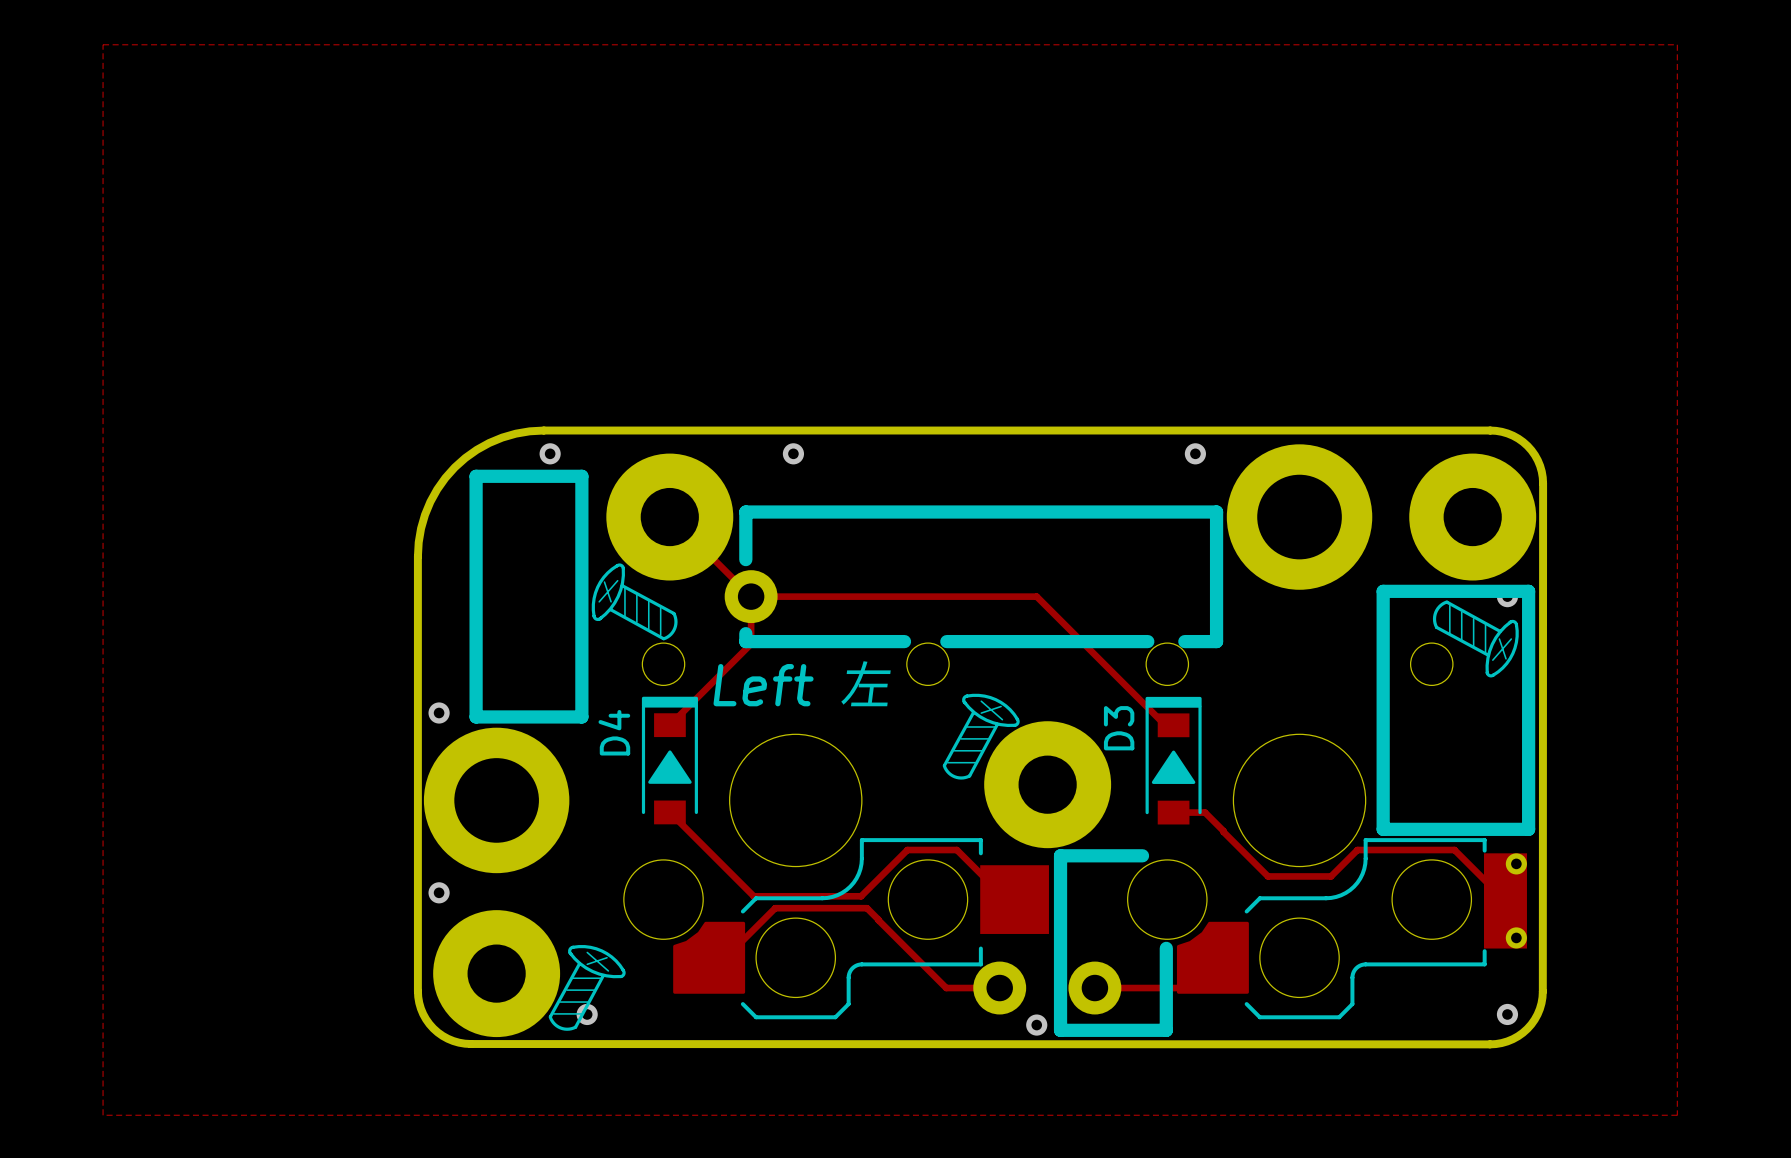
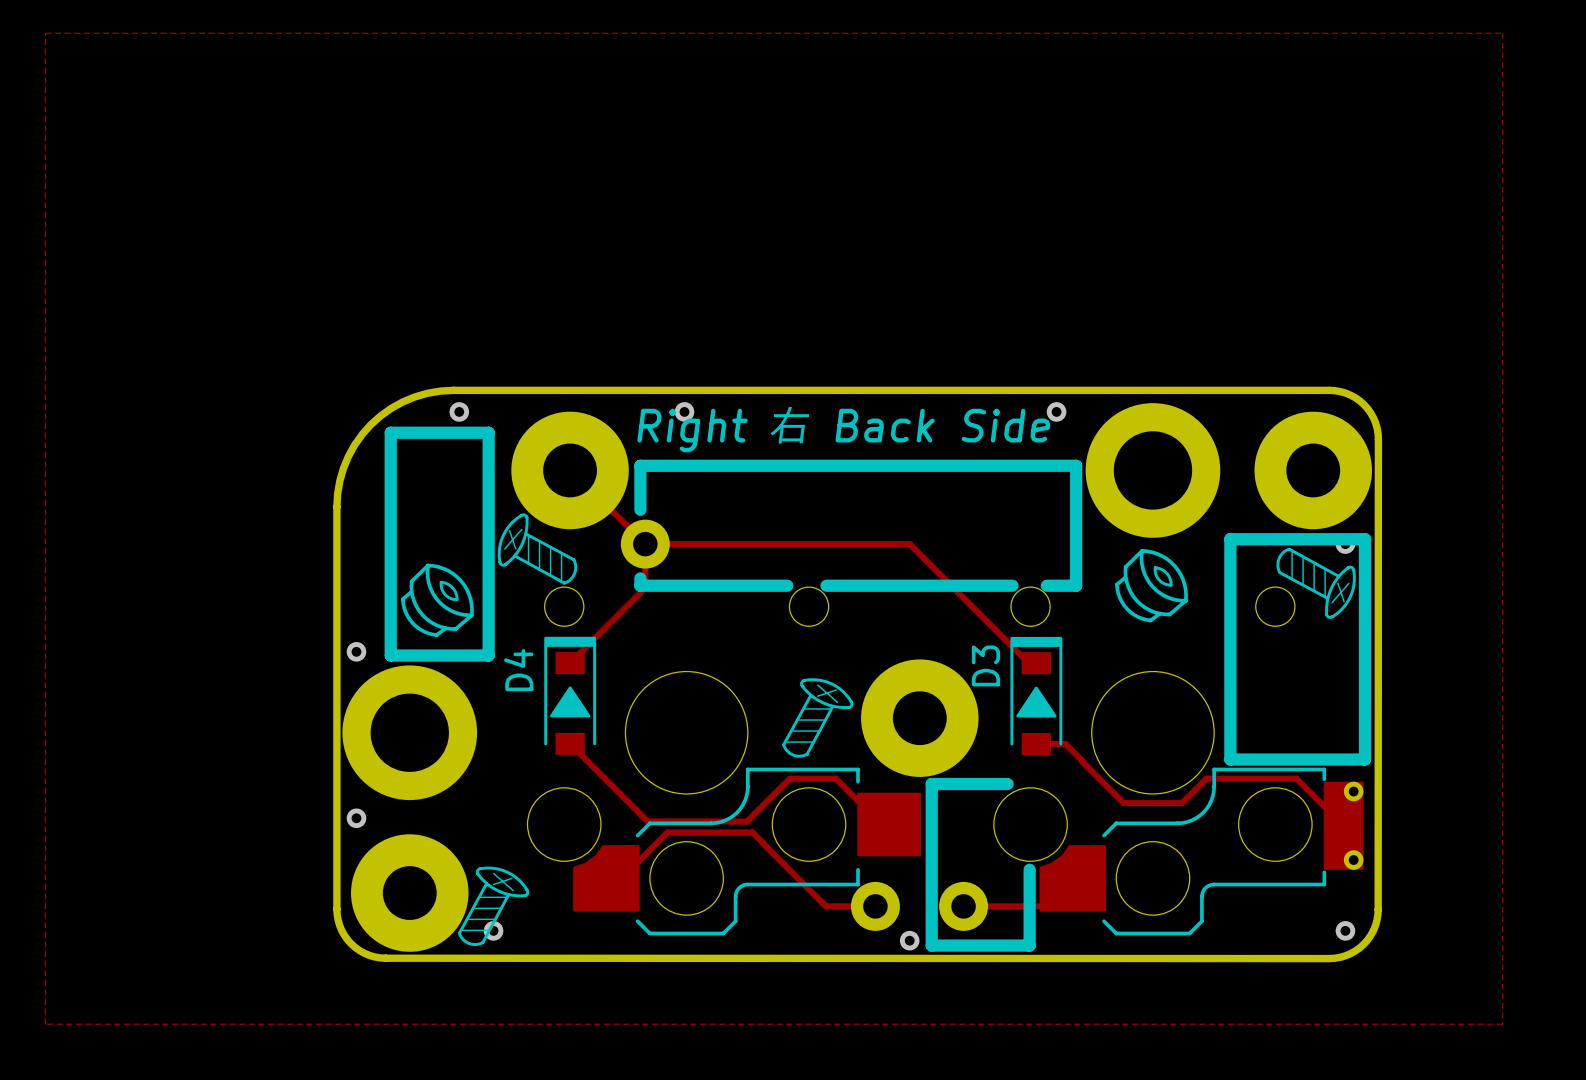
text: none -> Right 右 Back Side (843, 428)
drawing: none -> [1115, 549, 1188, 623]
drawing: none -> [401, 563, 474, 637]
text: Left 左 (803, 683) -> none
drawing position: (981, 736) -> (817, 717)

